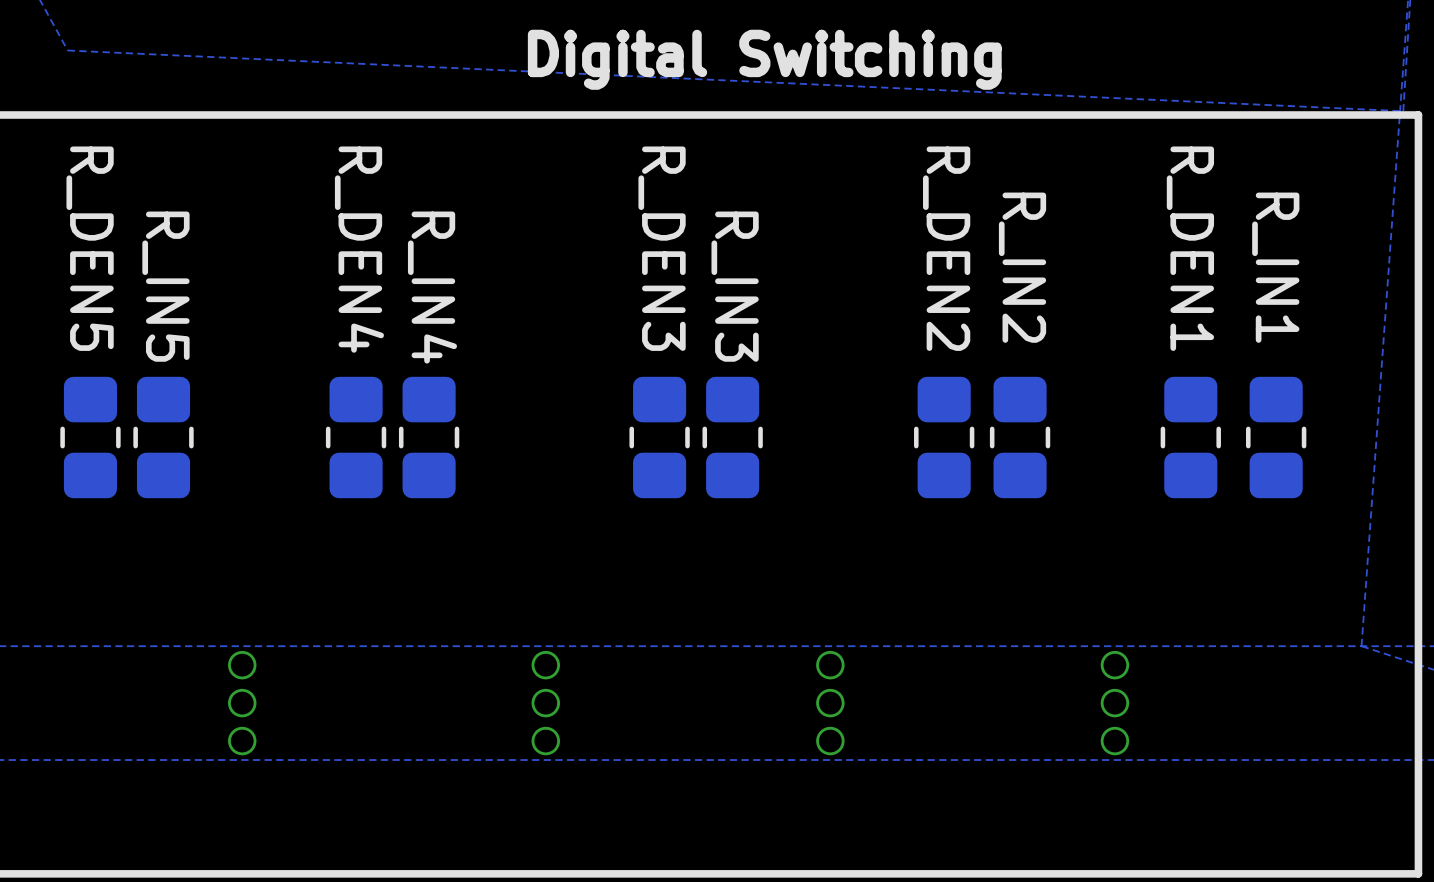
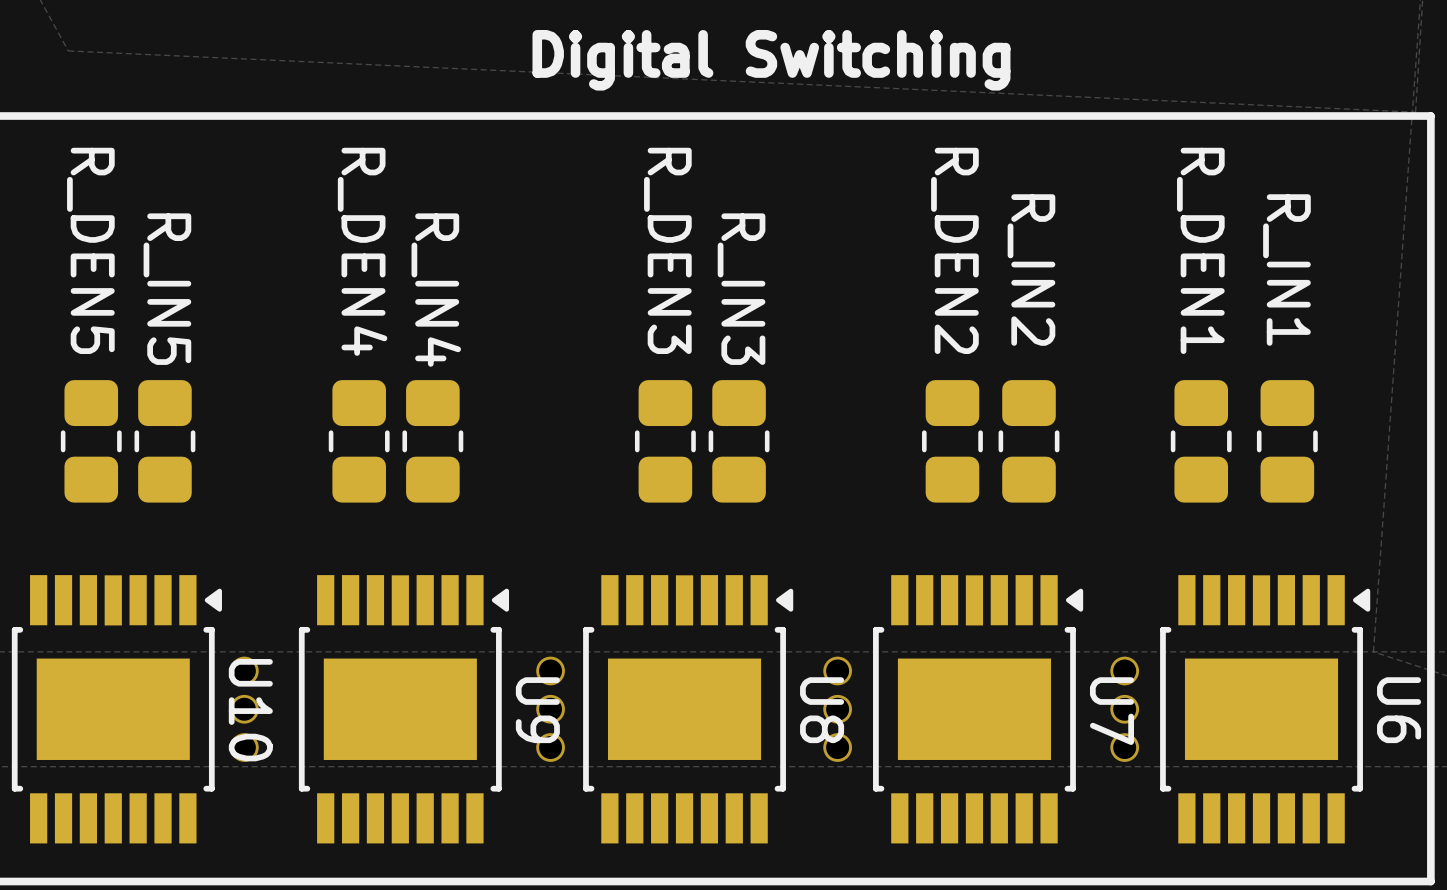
U10: none -> (116, 709)
U9: none -> (403, 709)
U8: none -> (688, 709)
U7: none -> (978, 709)
U6: none -> (1265, 709)

